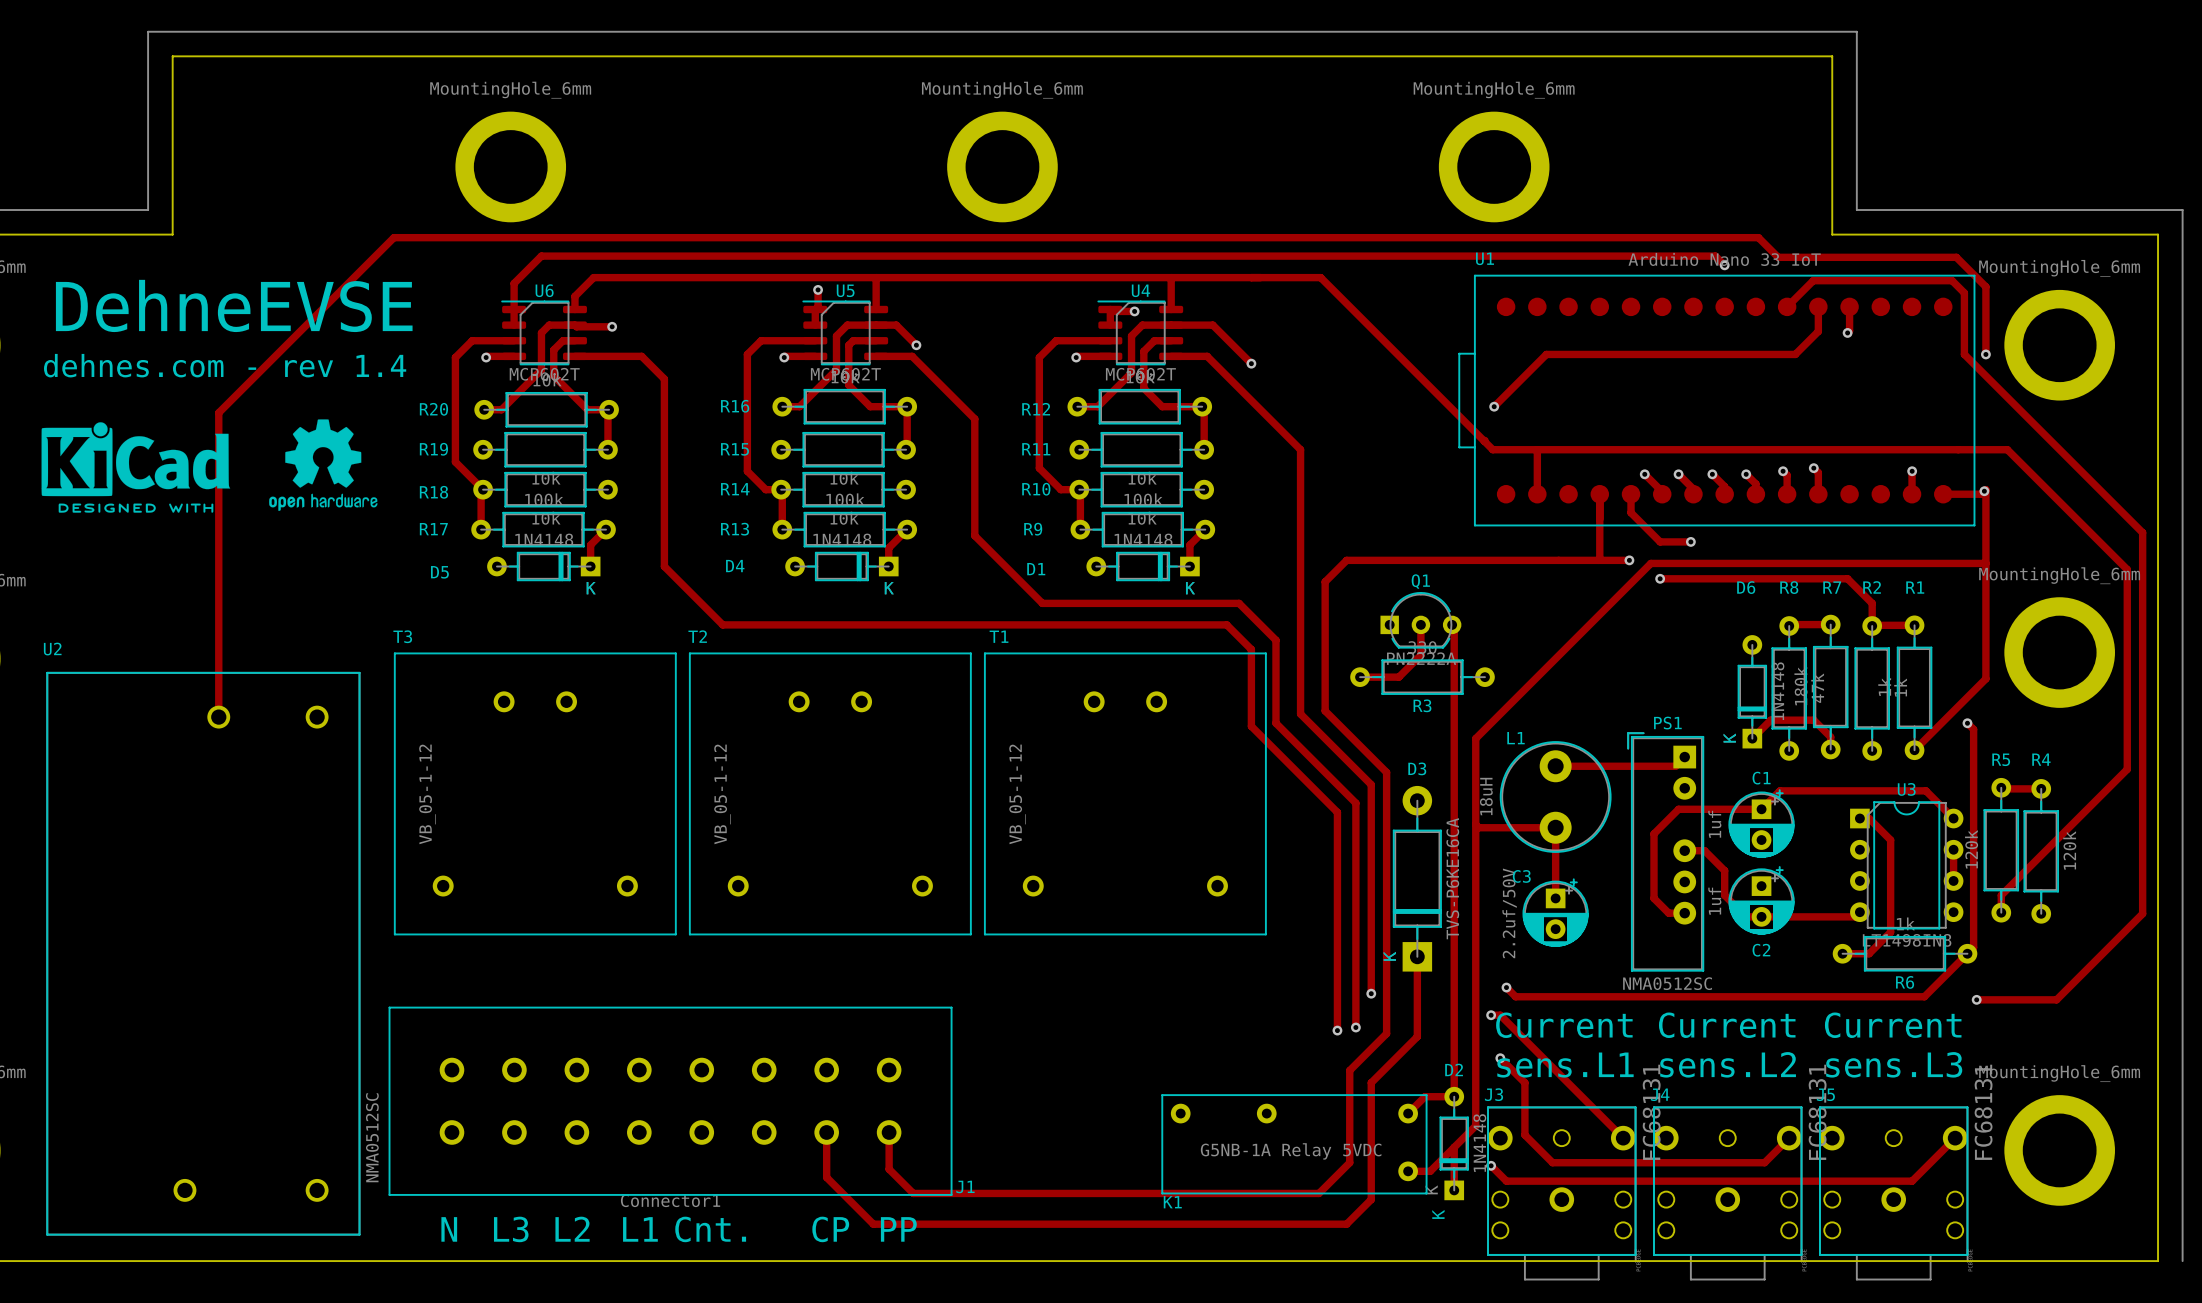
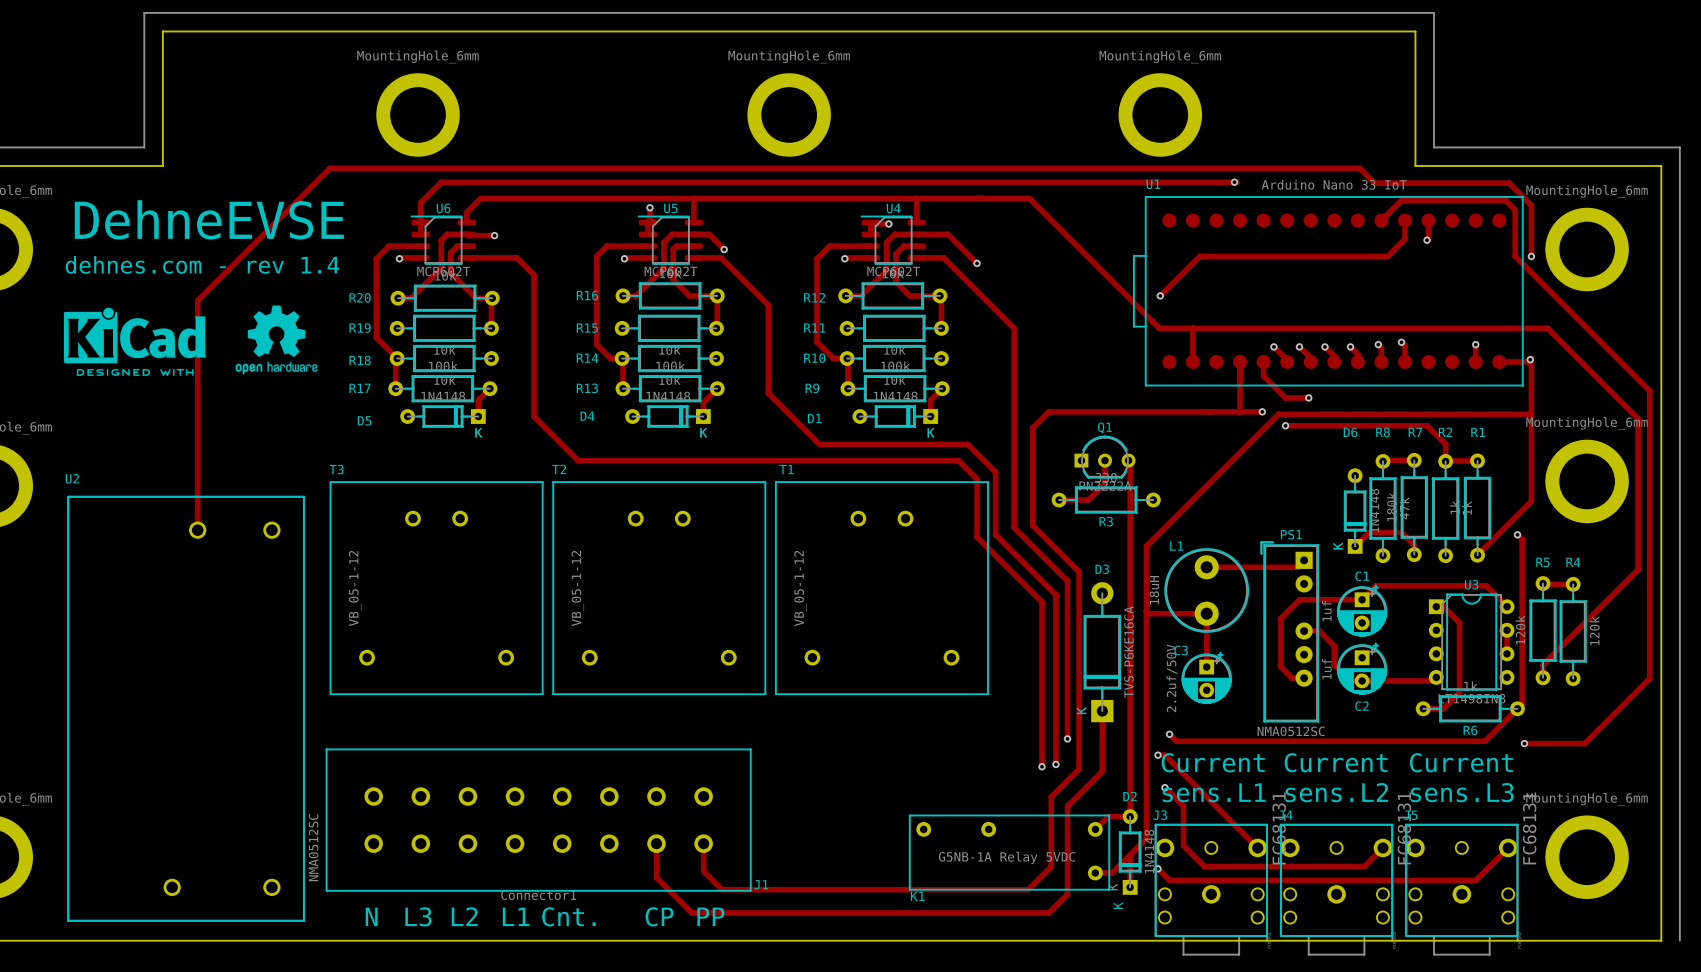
via: none -> (1234, 182)
track: (1595, 256) (1715, 256) (1724, 265) -> none
via: (1724, 265) -> none

